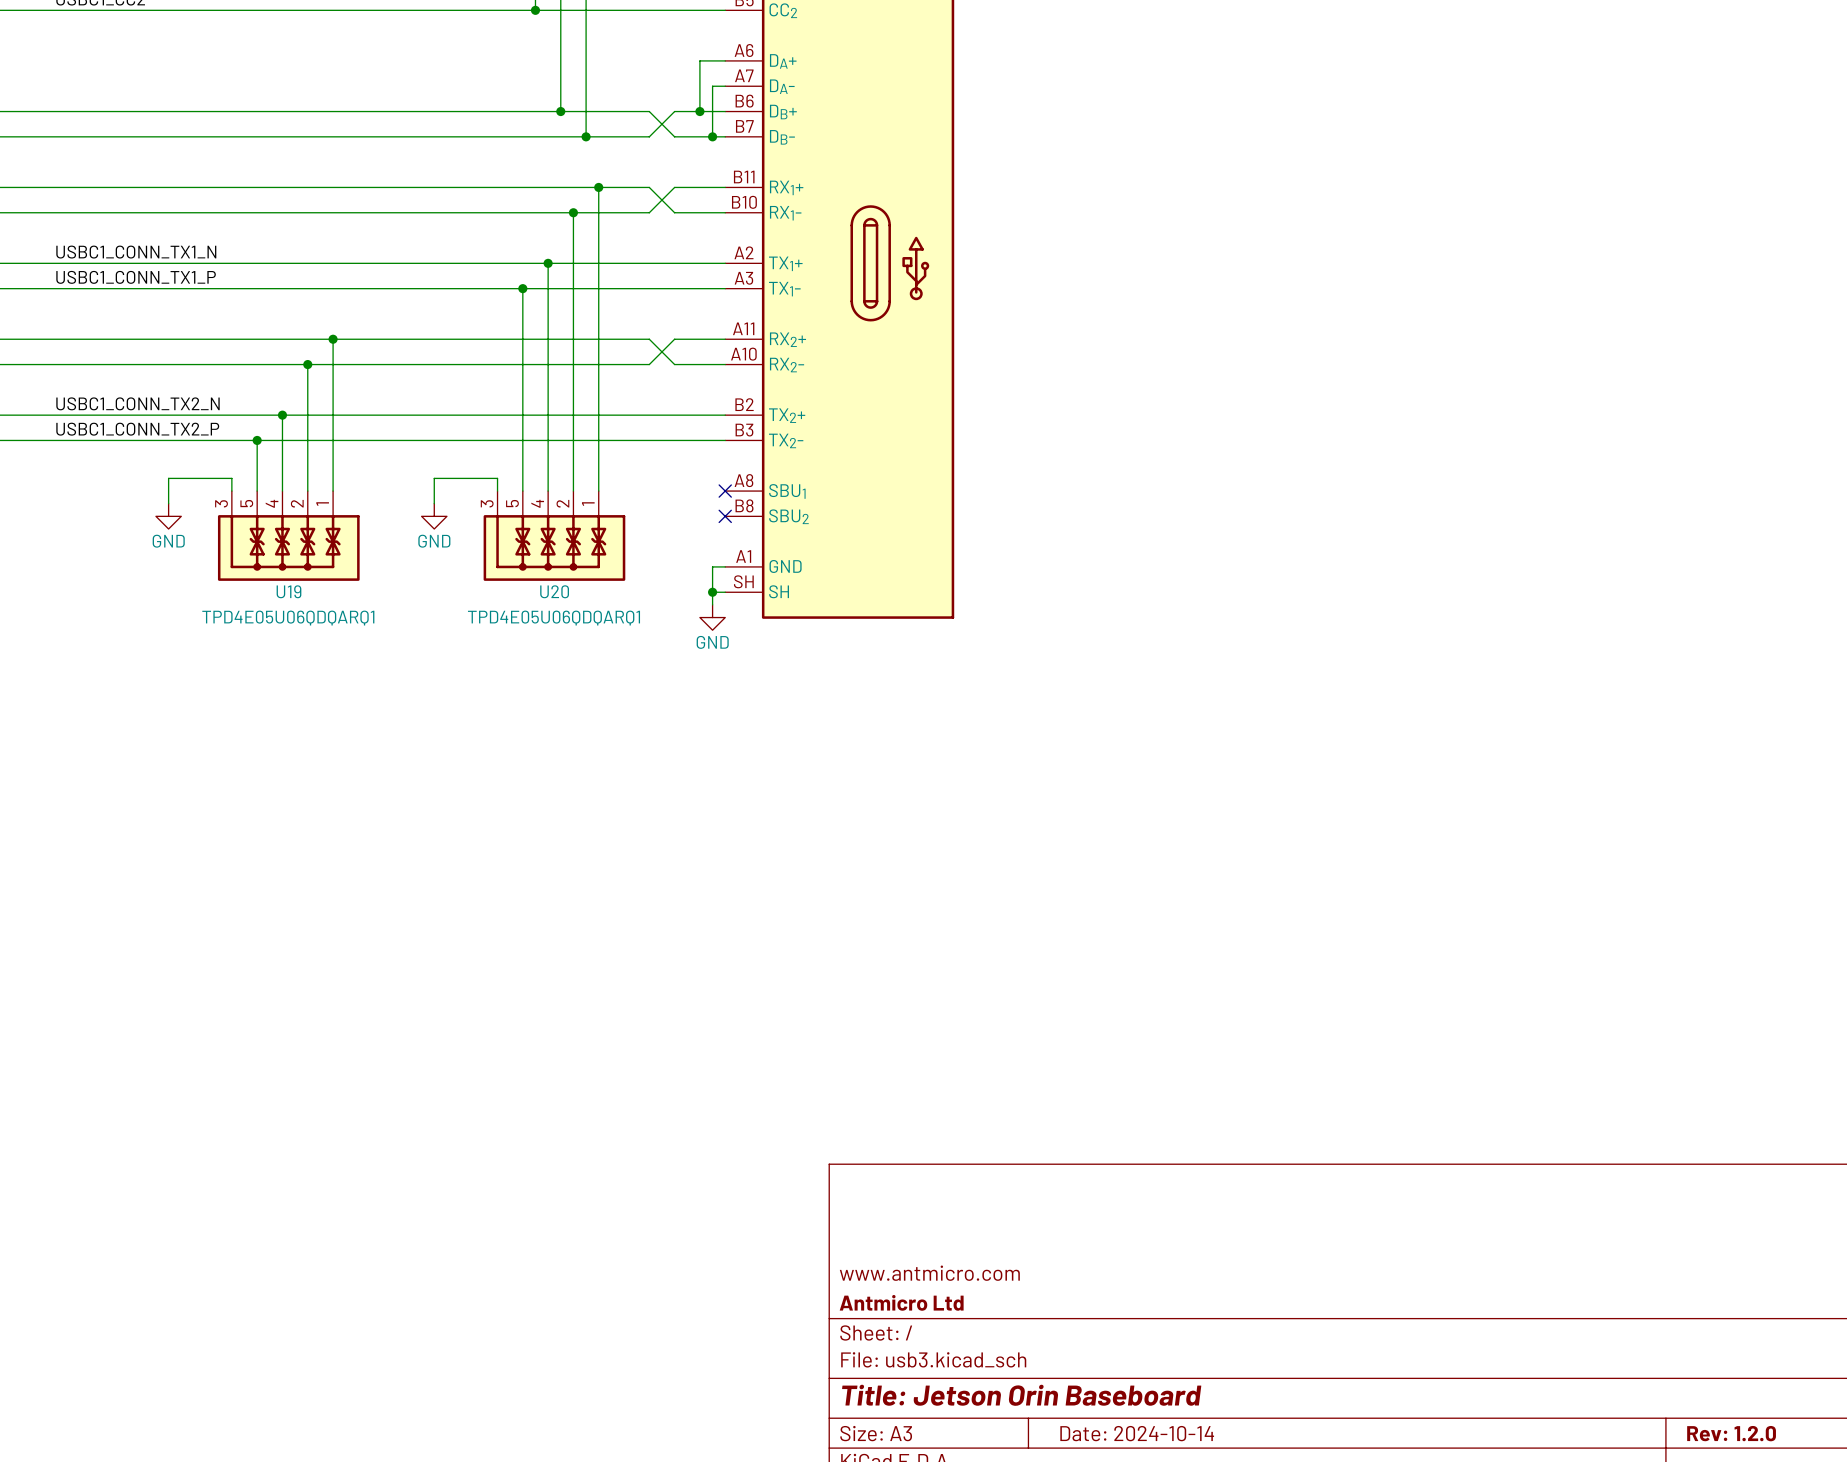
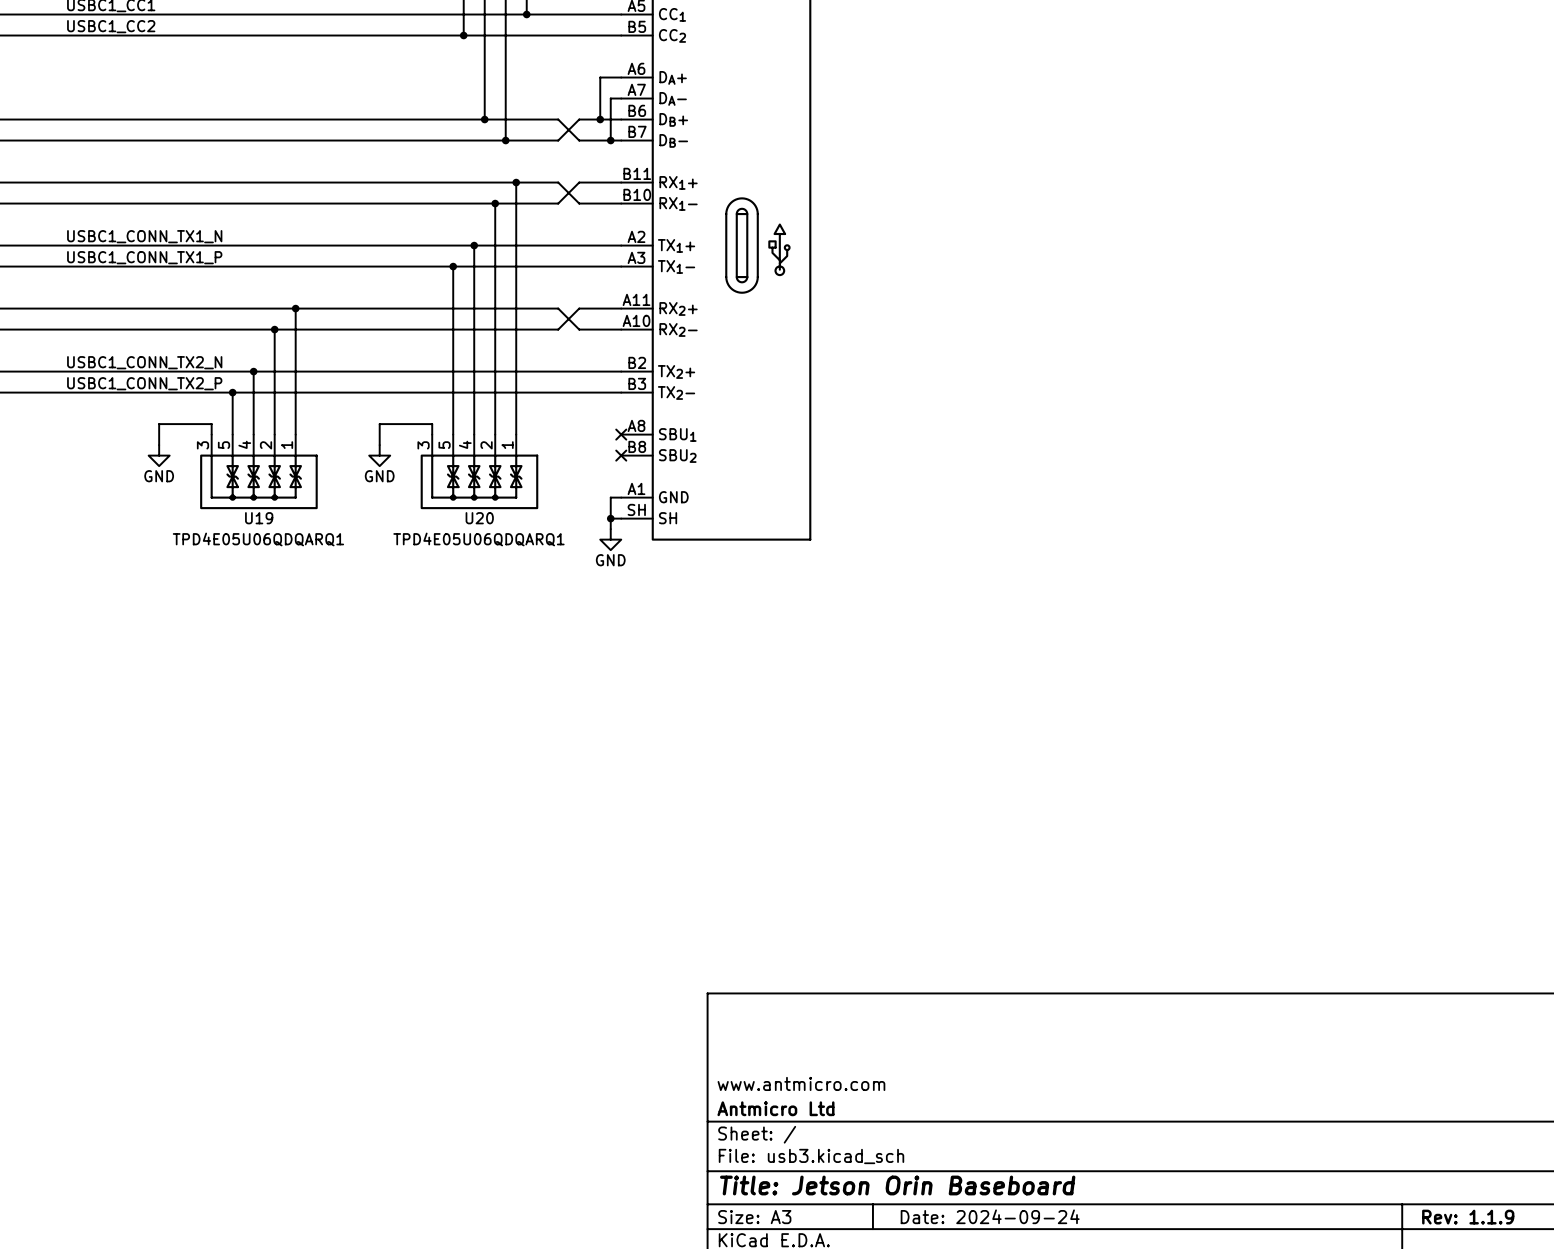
title block: Date: 2024-10-14 (1137, 1433) -> Date: 2024-09-24 (990, 1216)
title block: Rev: 1.2.0 (1731, 1433) -> Rev: 1.1.9 (1468, 1217)

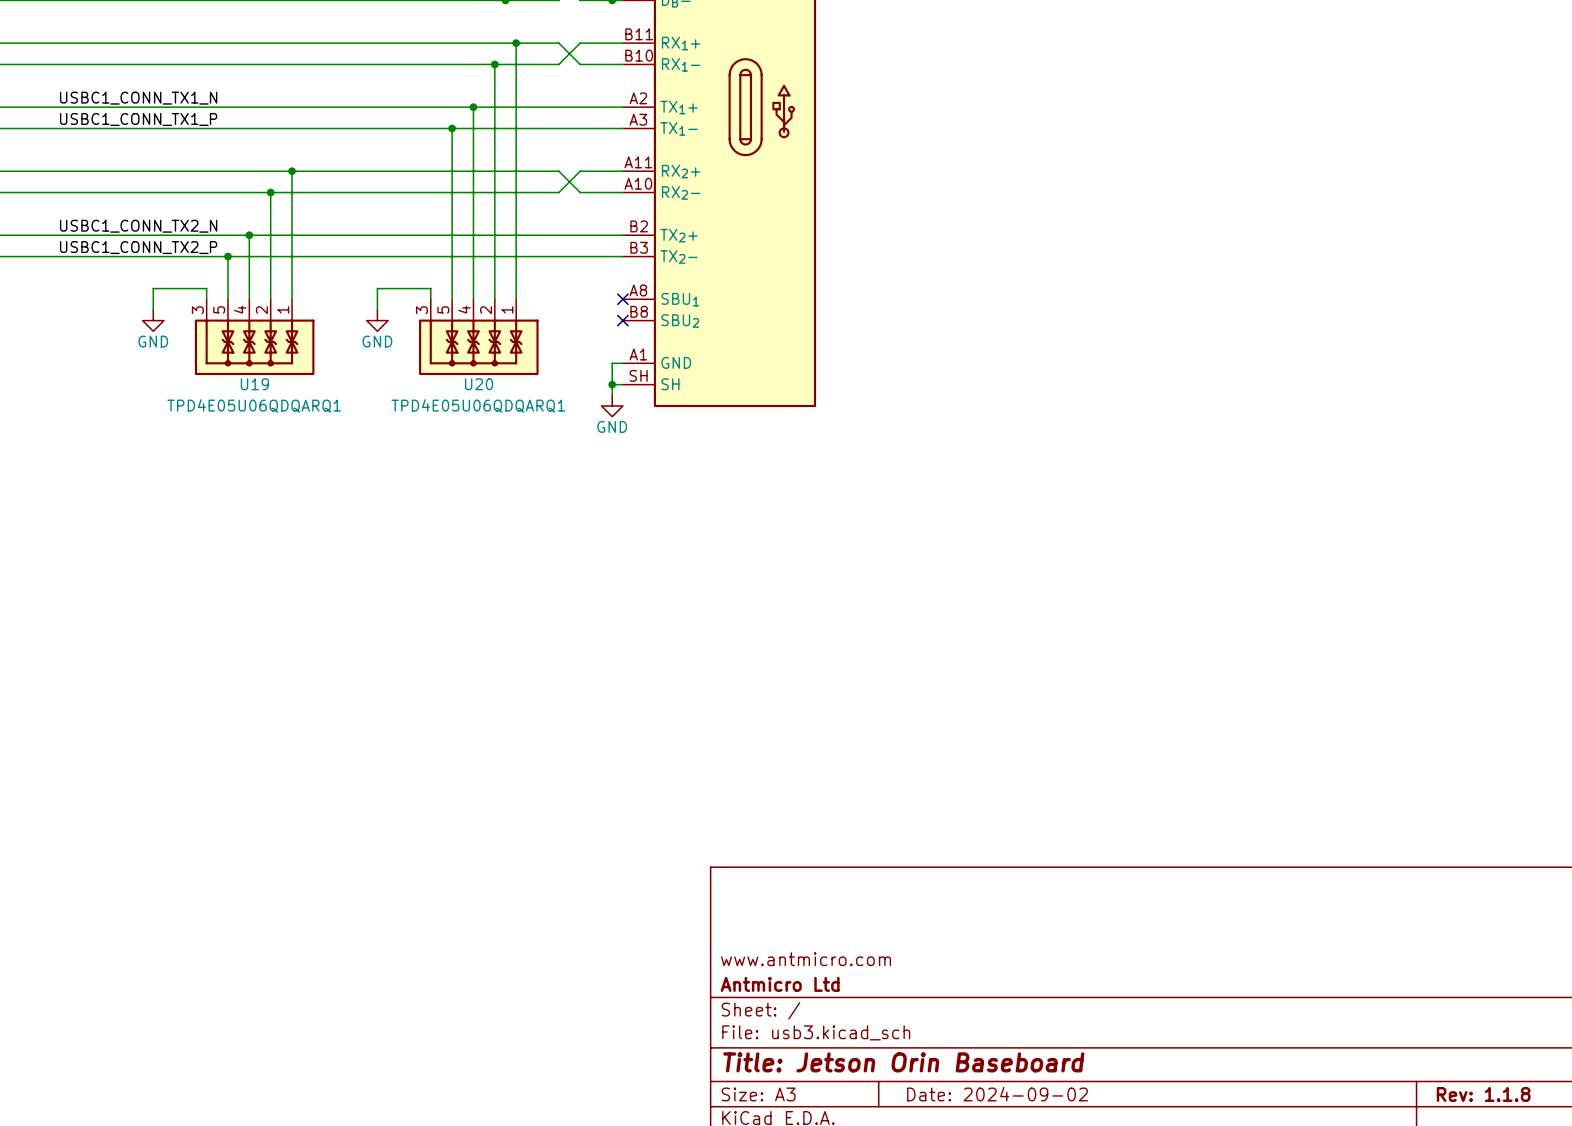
title block: Date: 2024-09-24 (990, 1216) -> Date: 2024-09-02 (997, 1094)
title block: Rev: 1.1.9 (1468, 1217) -> Rev: 1.1.8 (1483, 1094)

